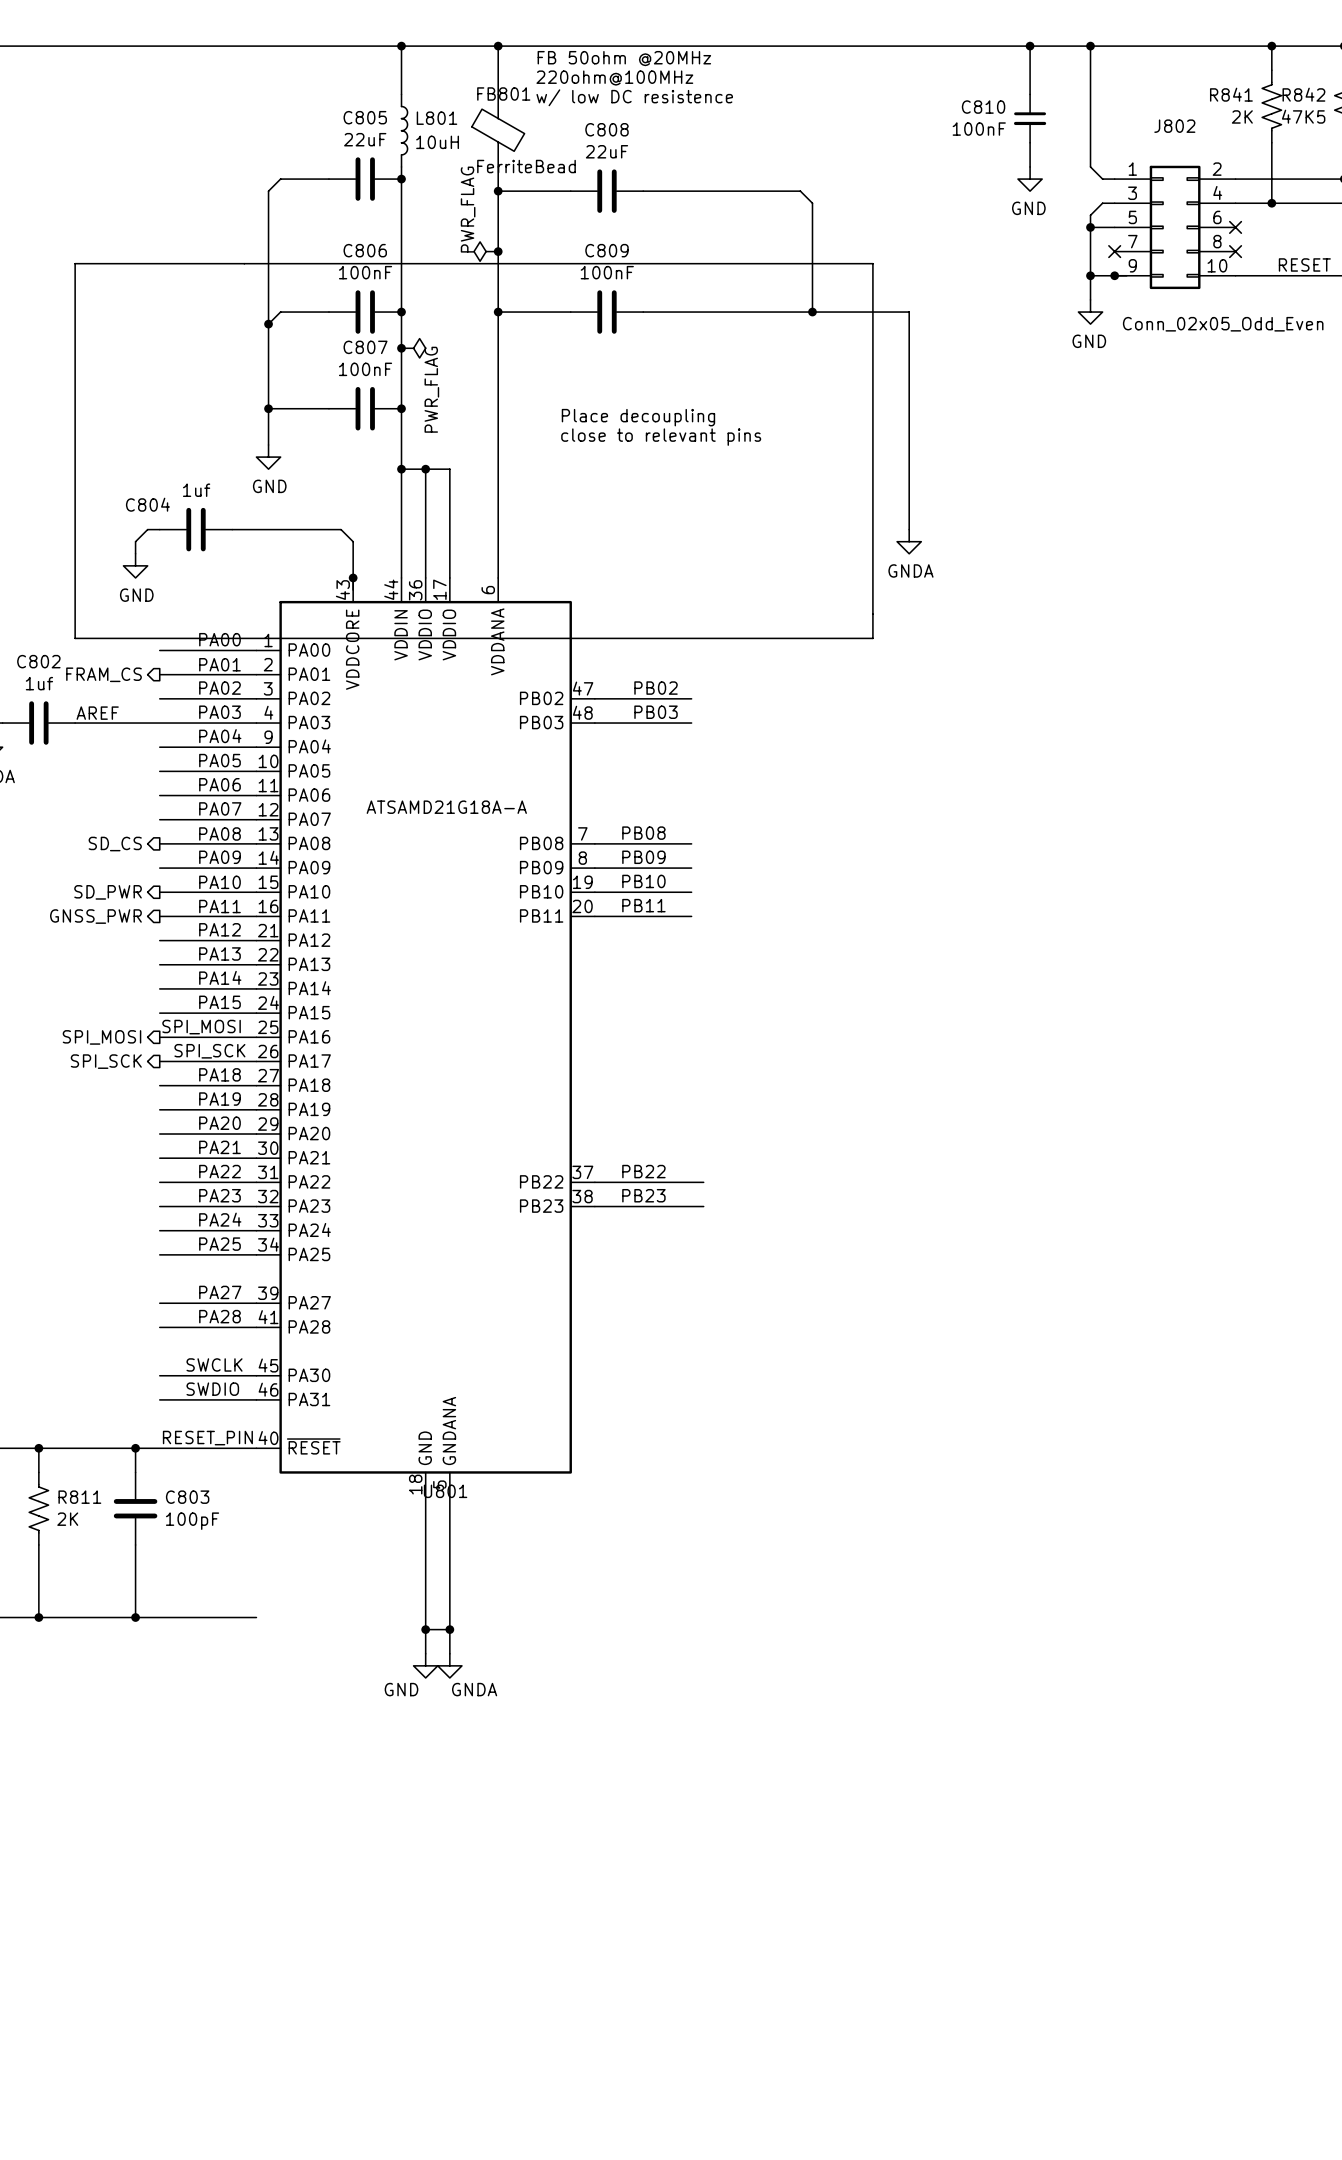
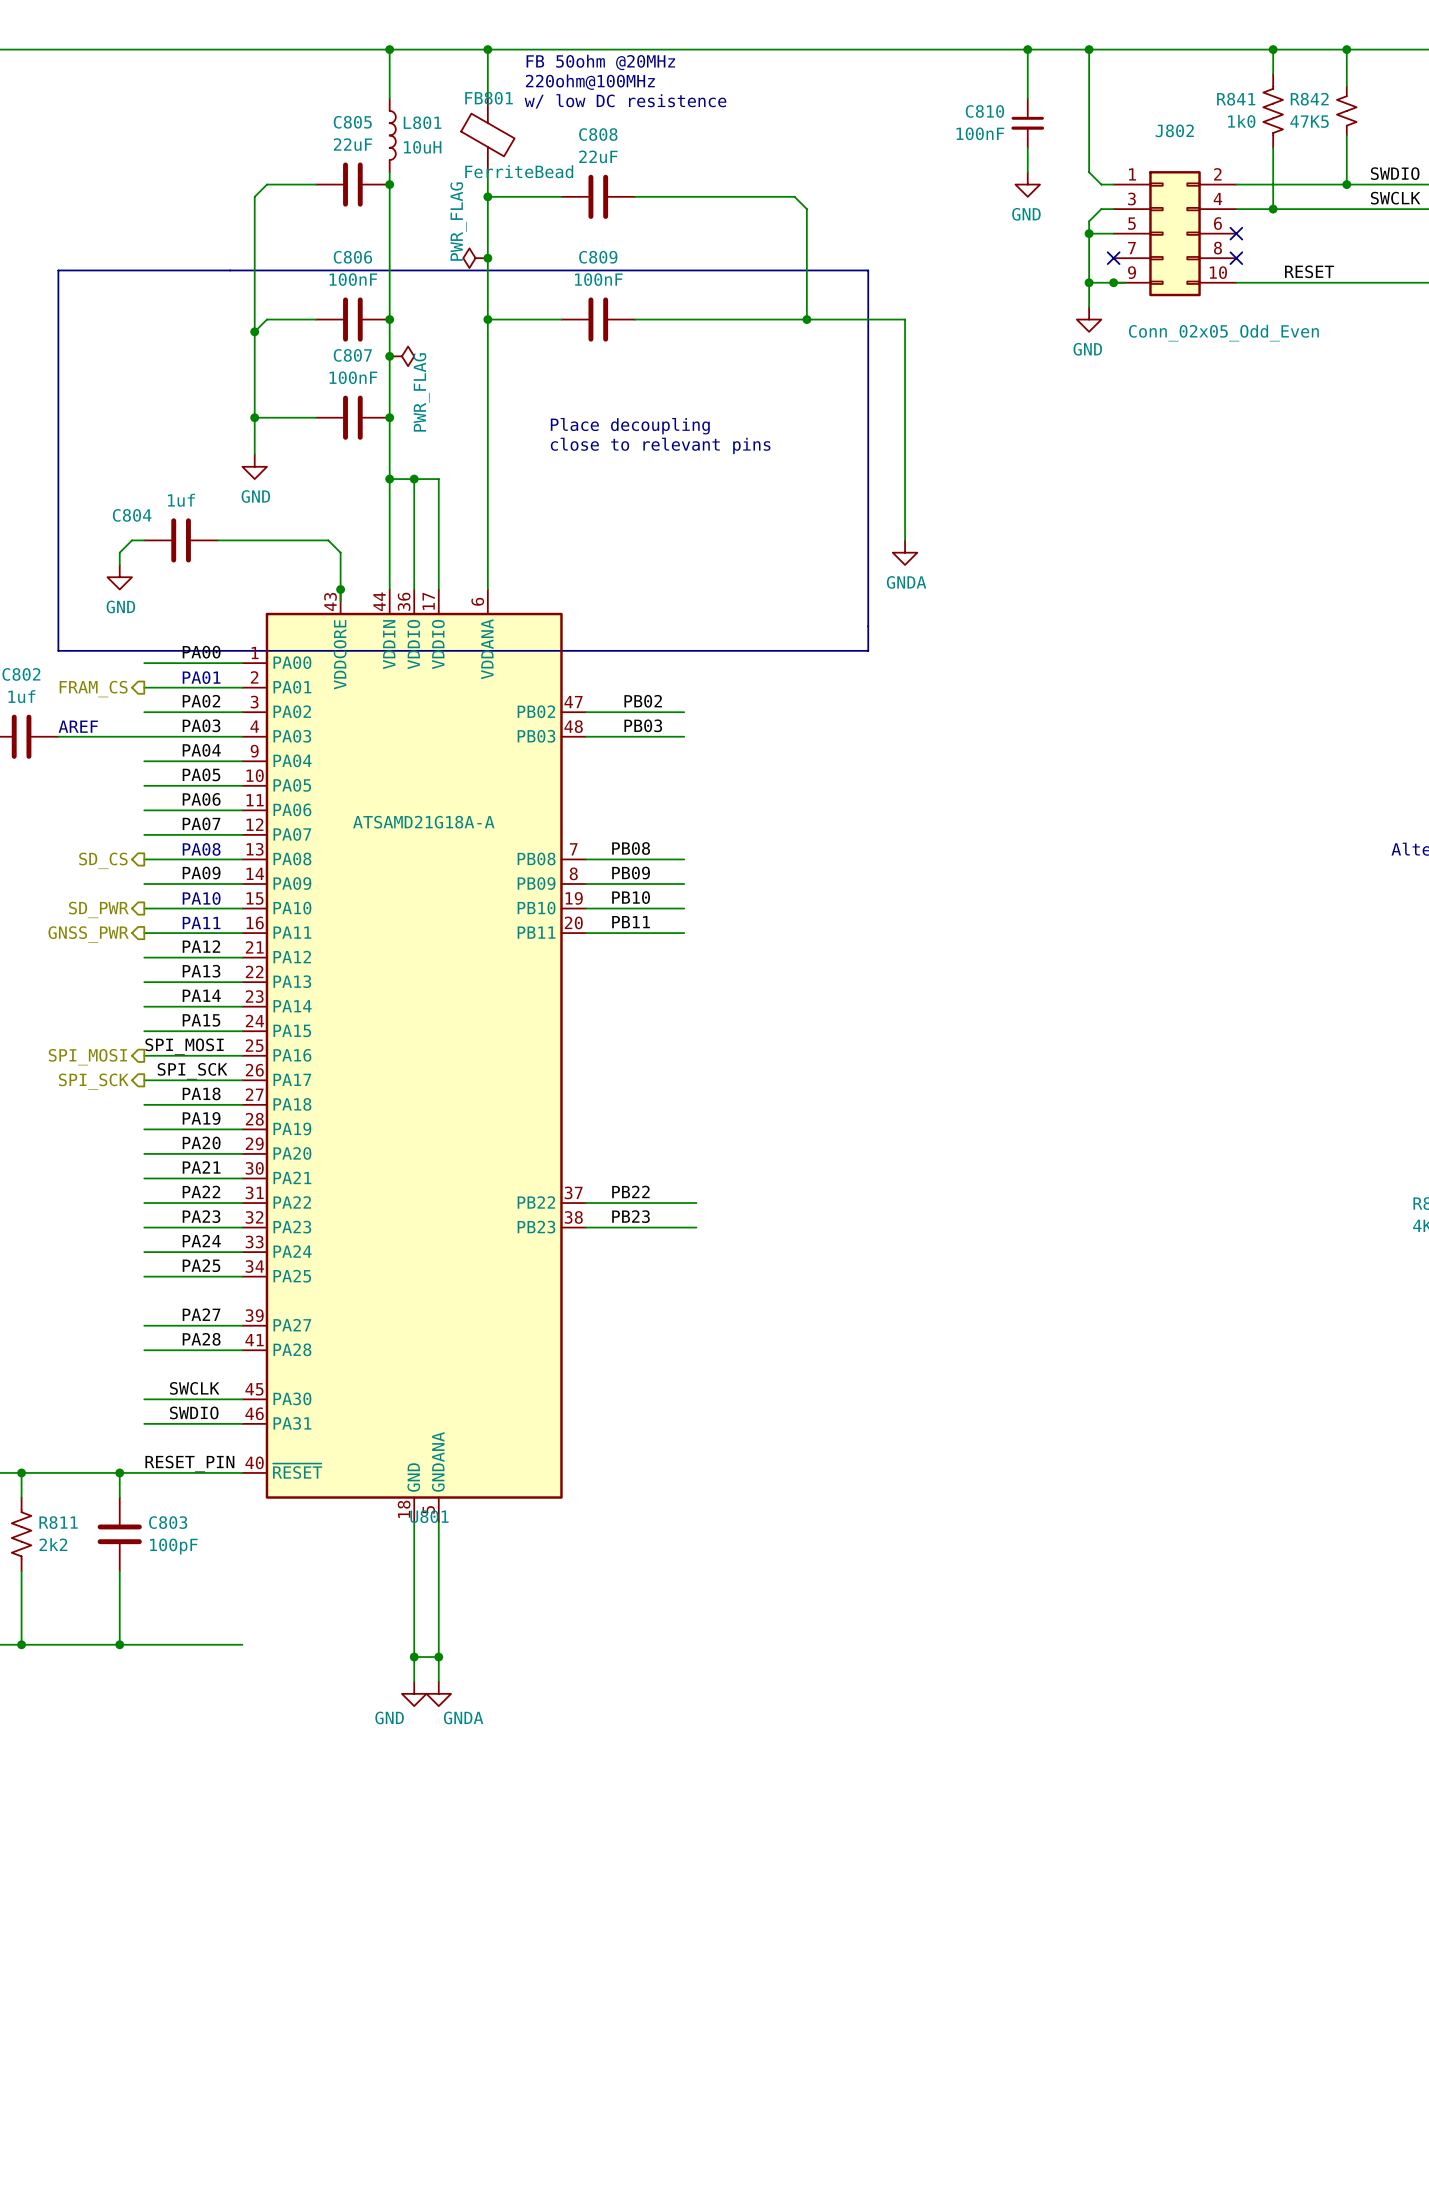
R841 value: 2K (1242, 116) -> 1k0 (1241, 121)
R811 value: 2K (67, 1519) -> 2k2 (53, 1544)

